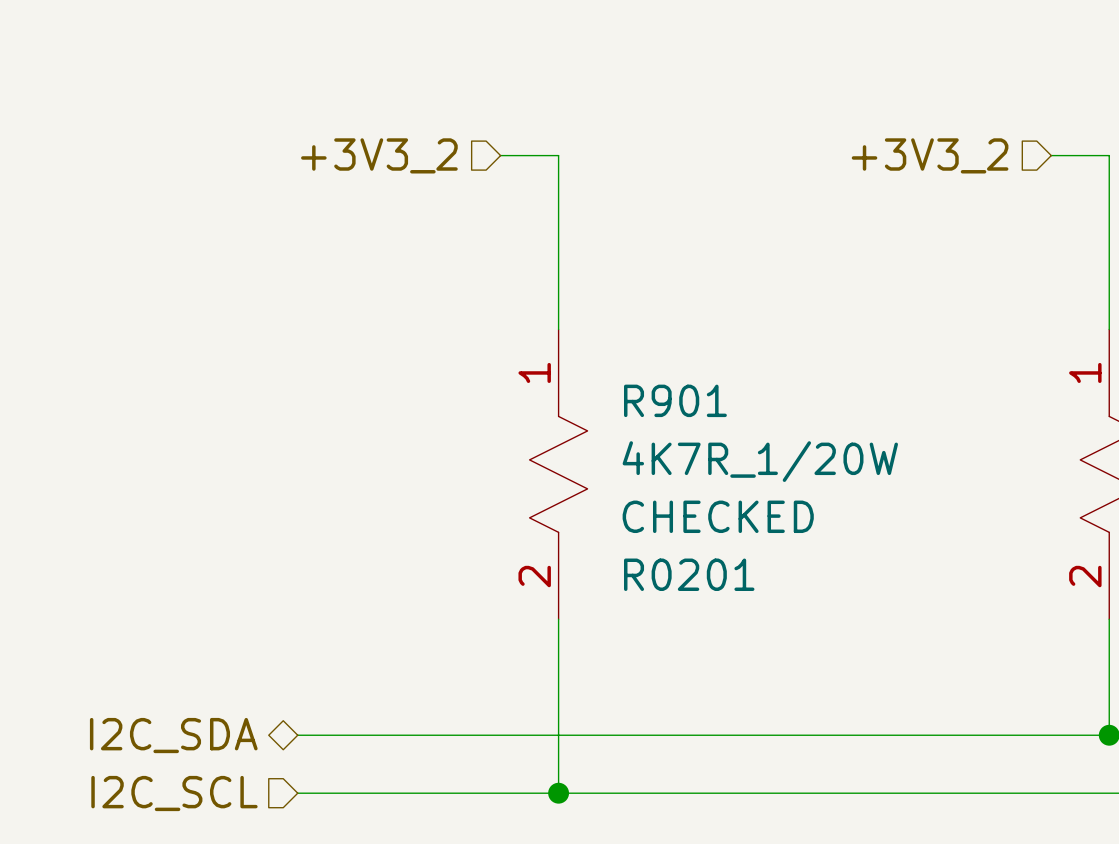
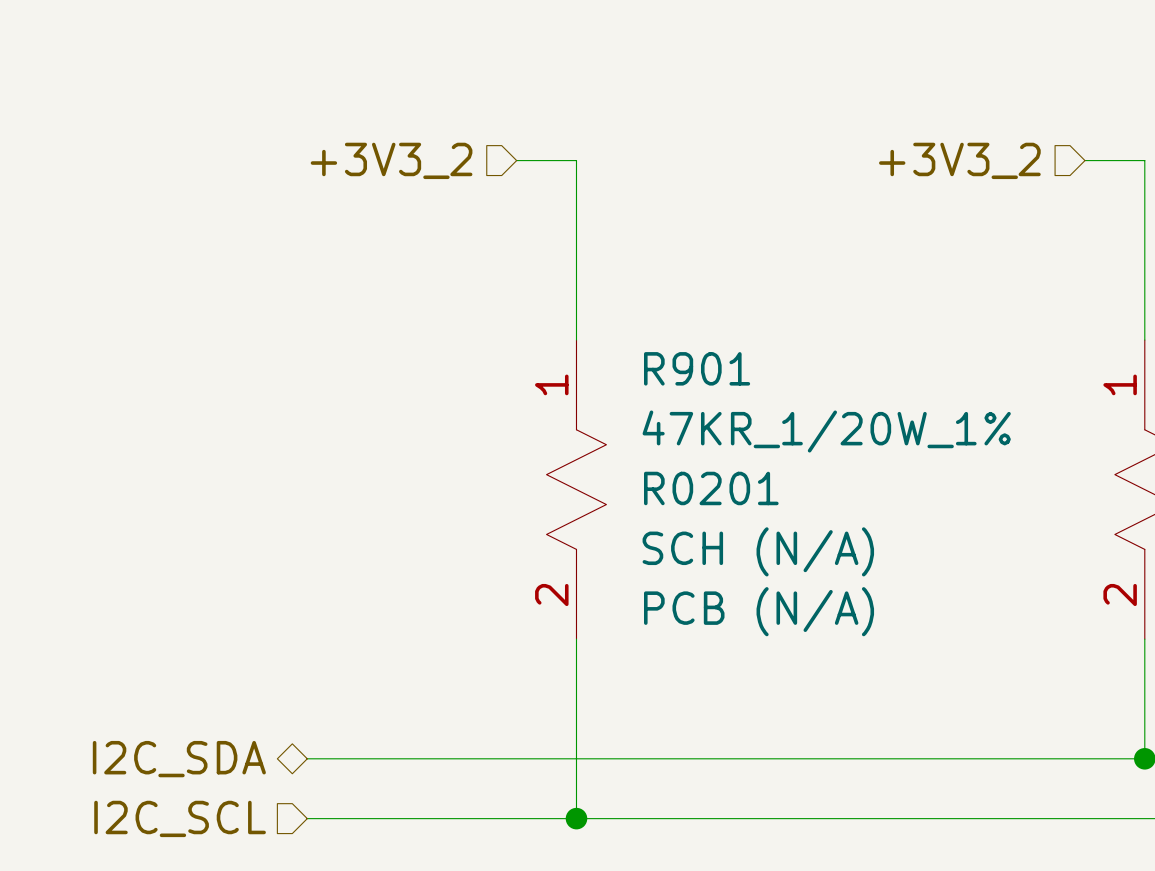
R901 name position: R901 (675, 400) -> R901 (697, 368)
R901 value: 4K7R_1/20W (760, 461) -> 47KR_1/20W_1% (826, 431)
R901 text: CHECKED (718, 516) -> SCH (N/A) (758, 551)
R901 text position: R0201 (689, 574) -> R0201 (711, 488)
R901 text: none -> PCB (N/A) (759, 611)

